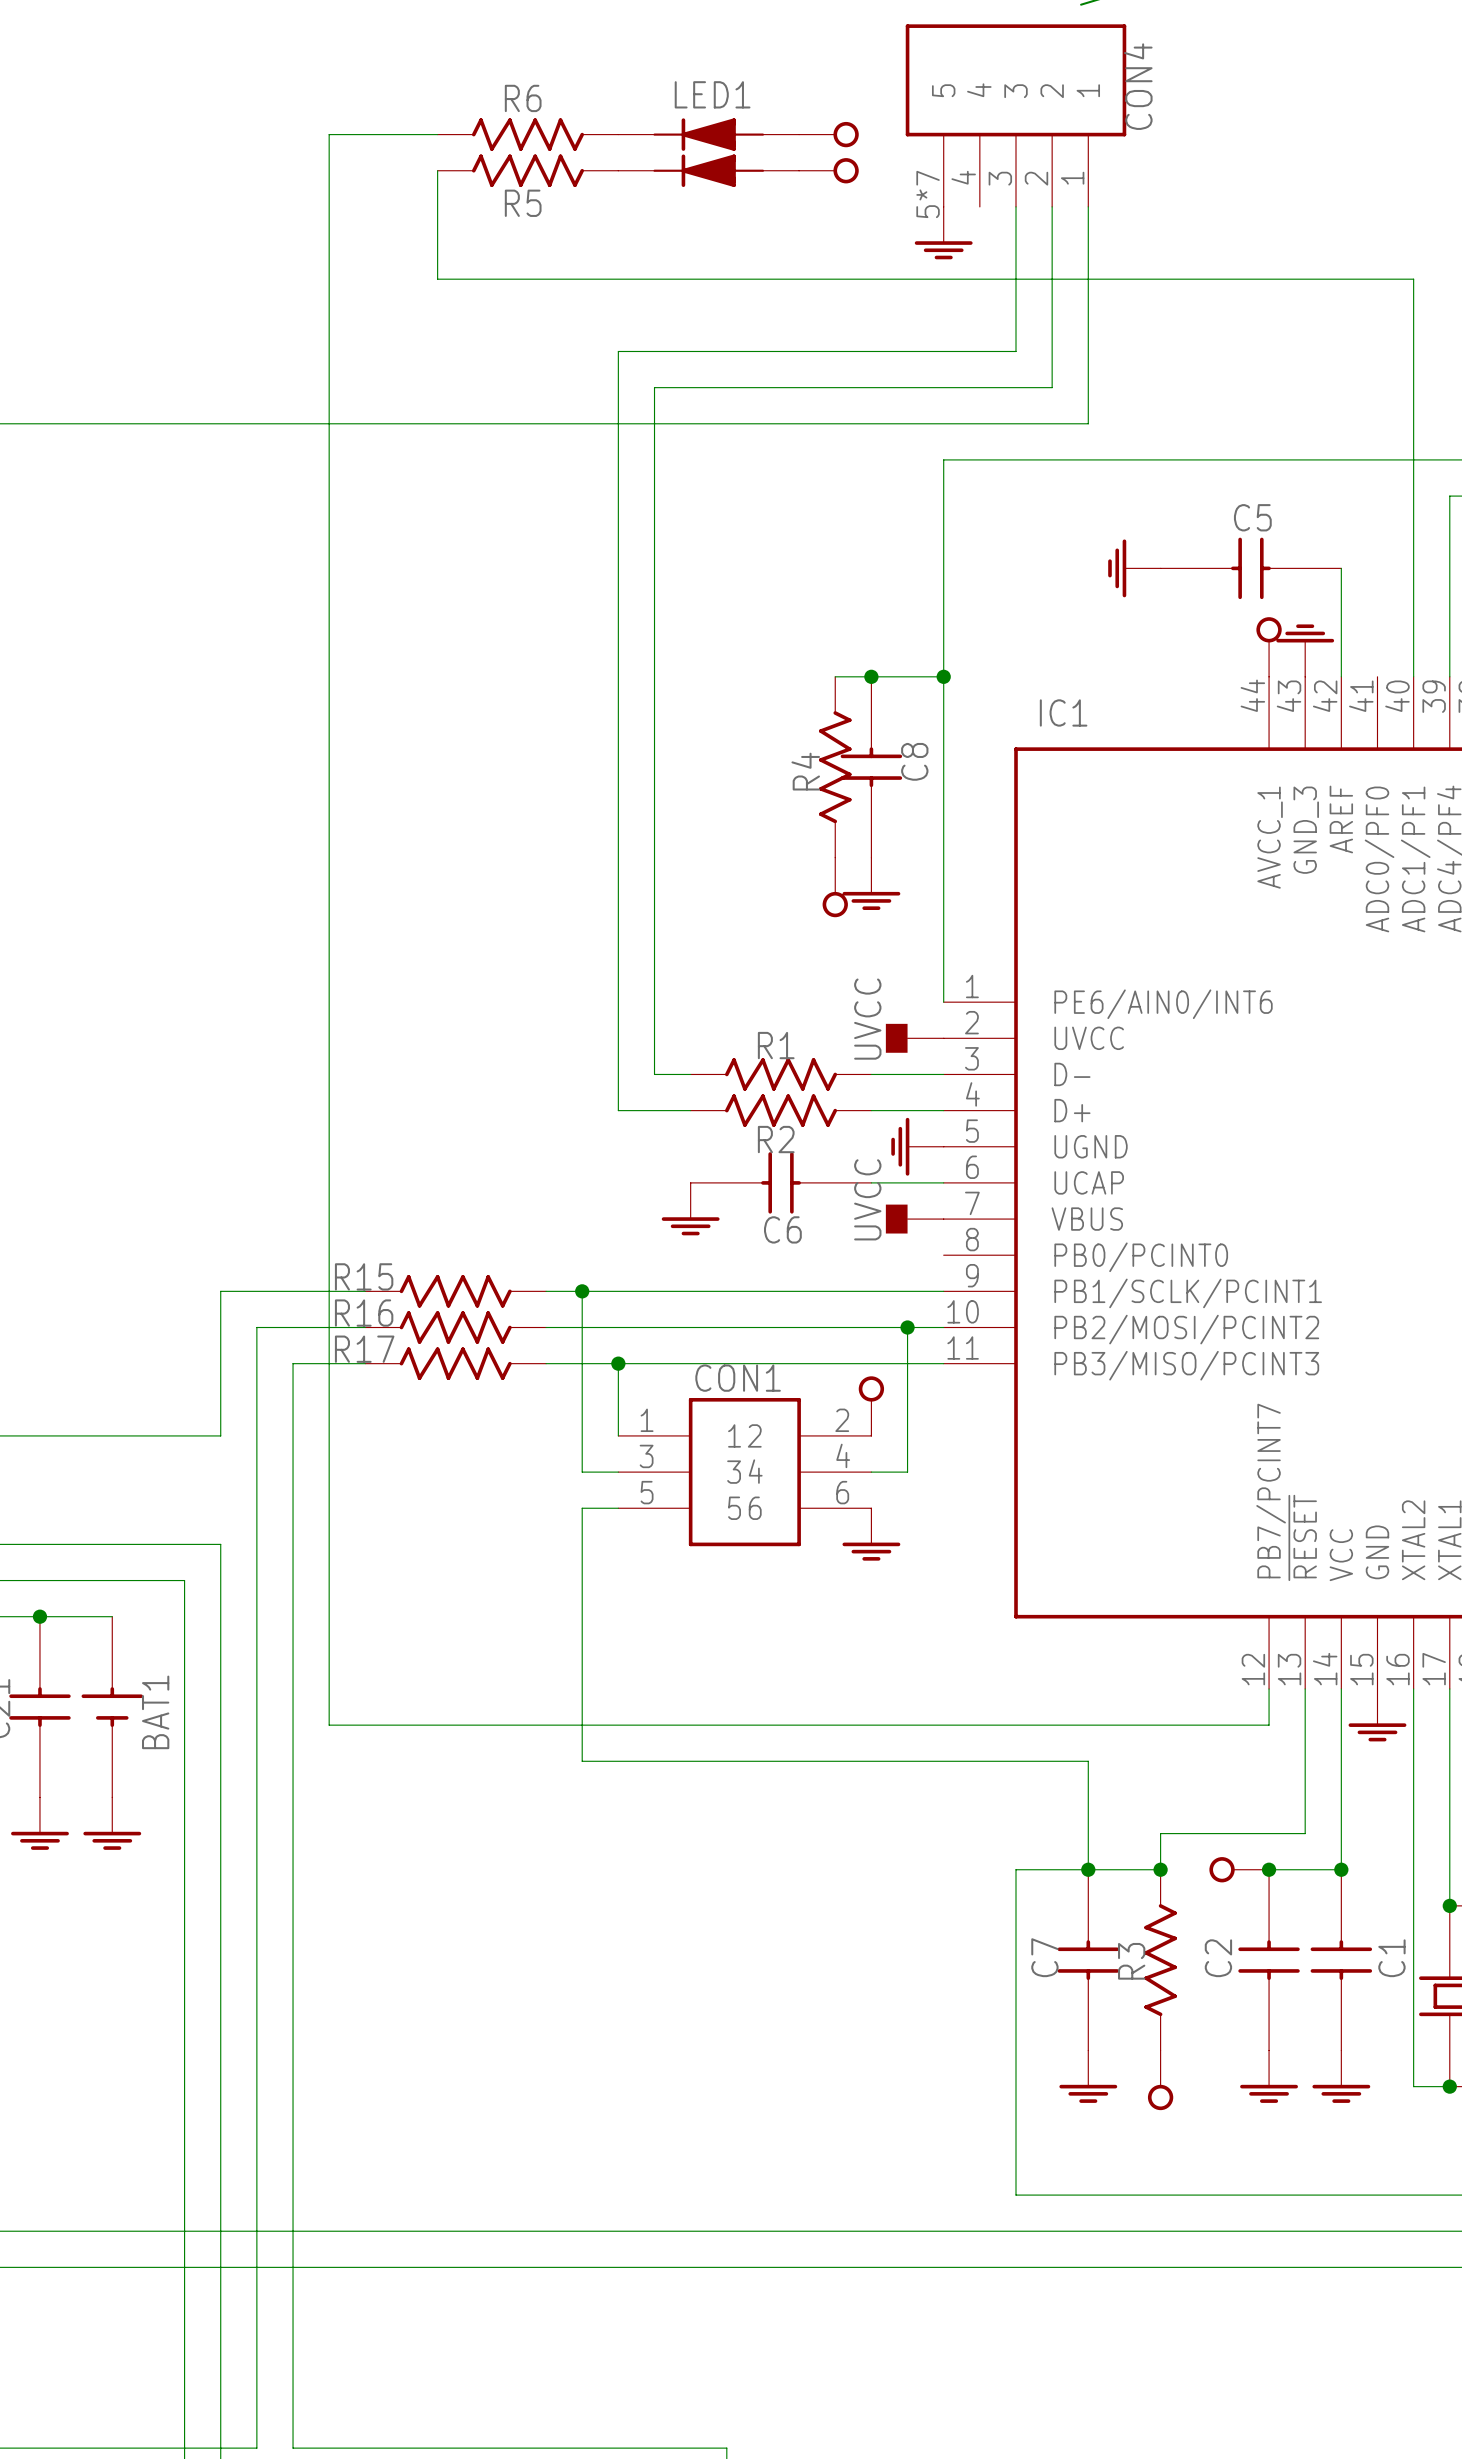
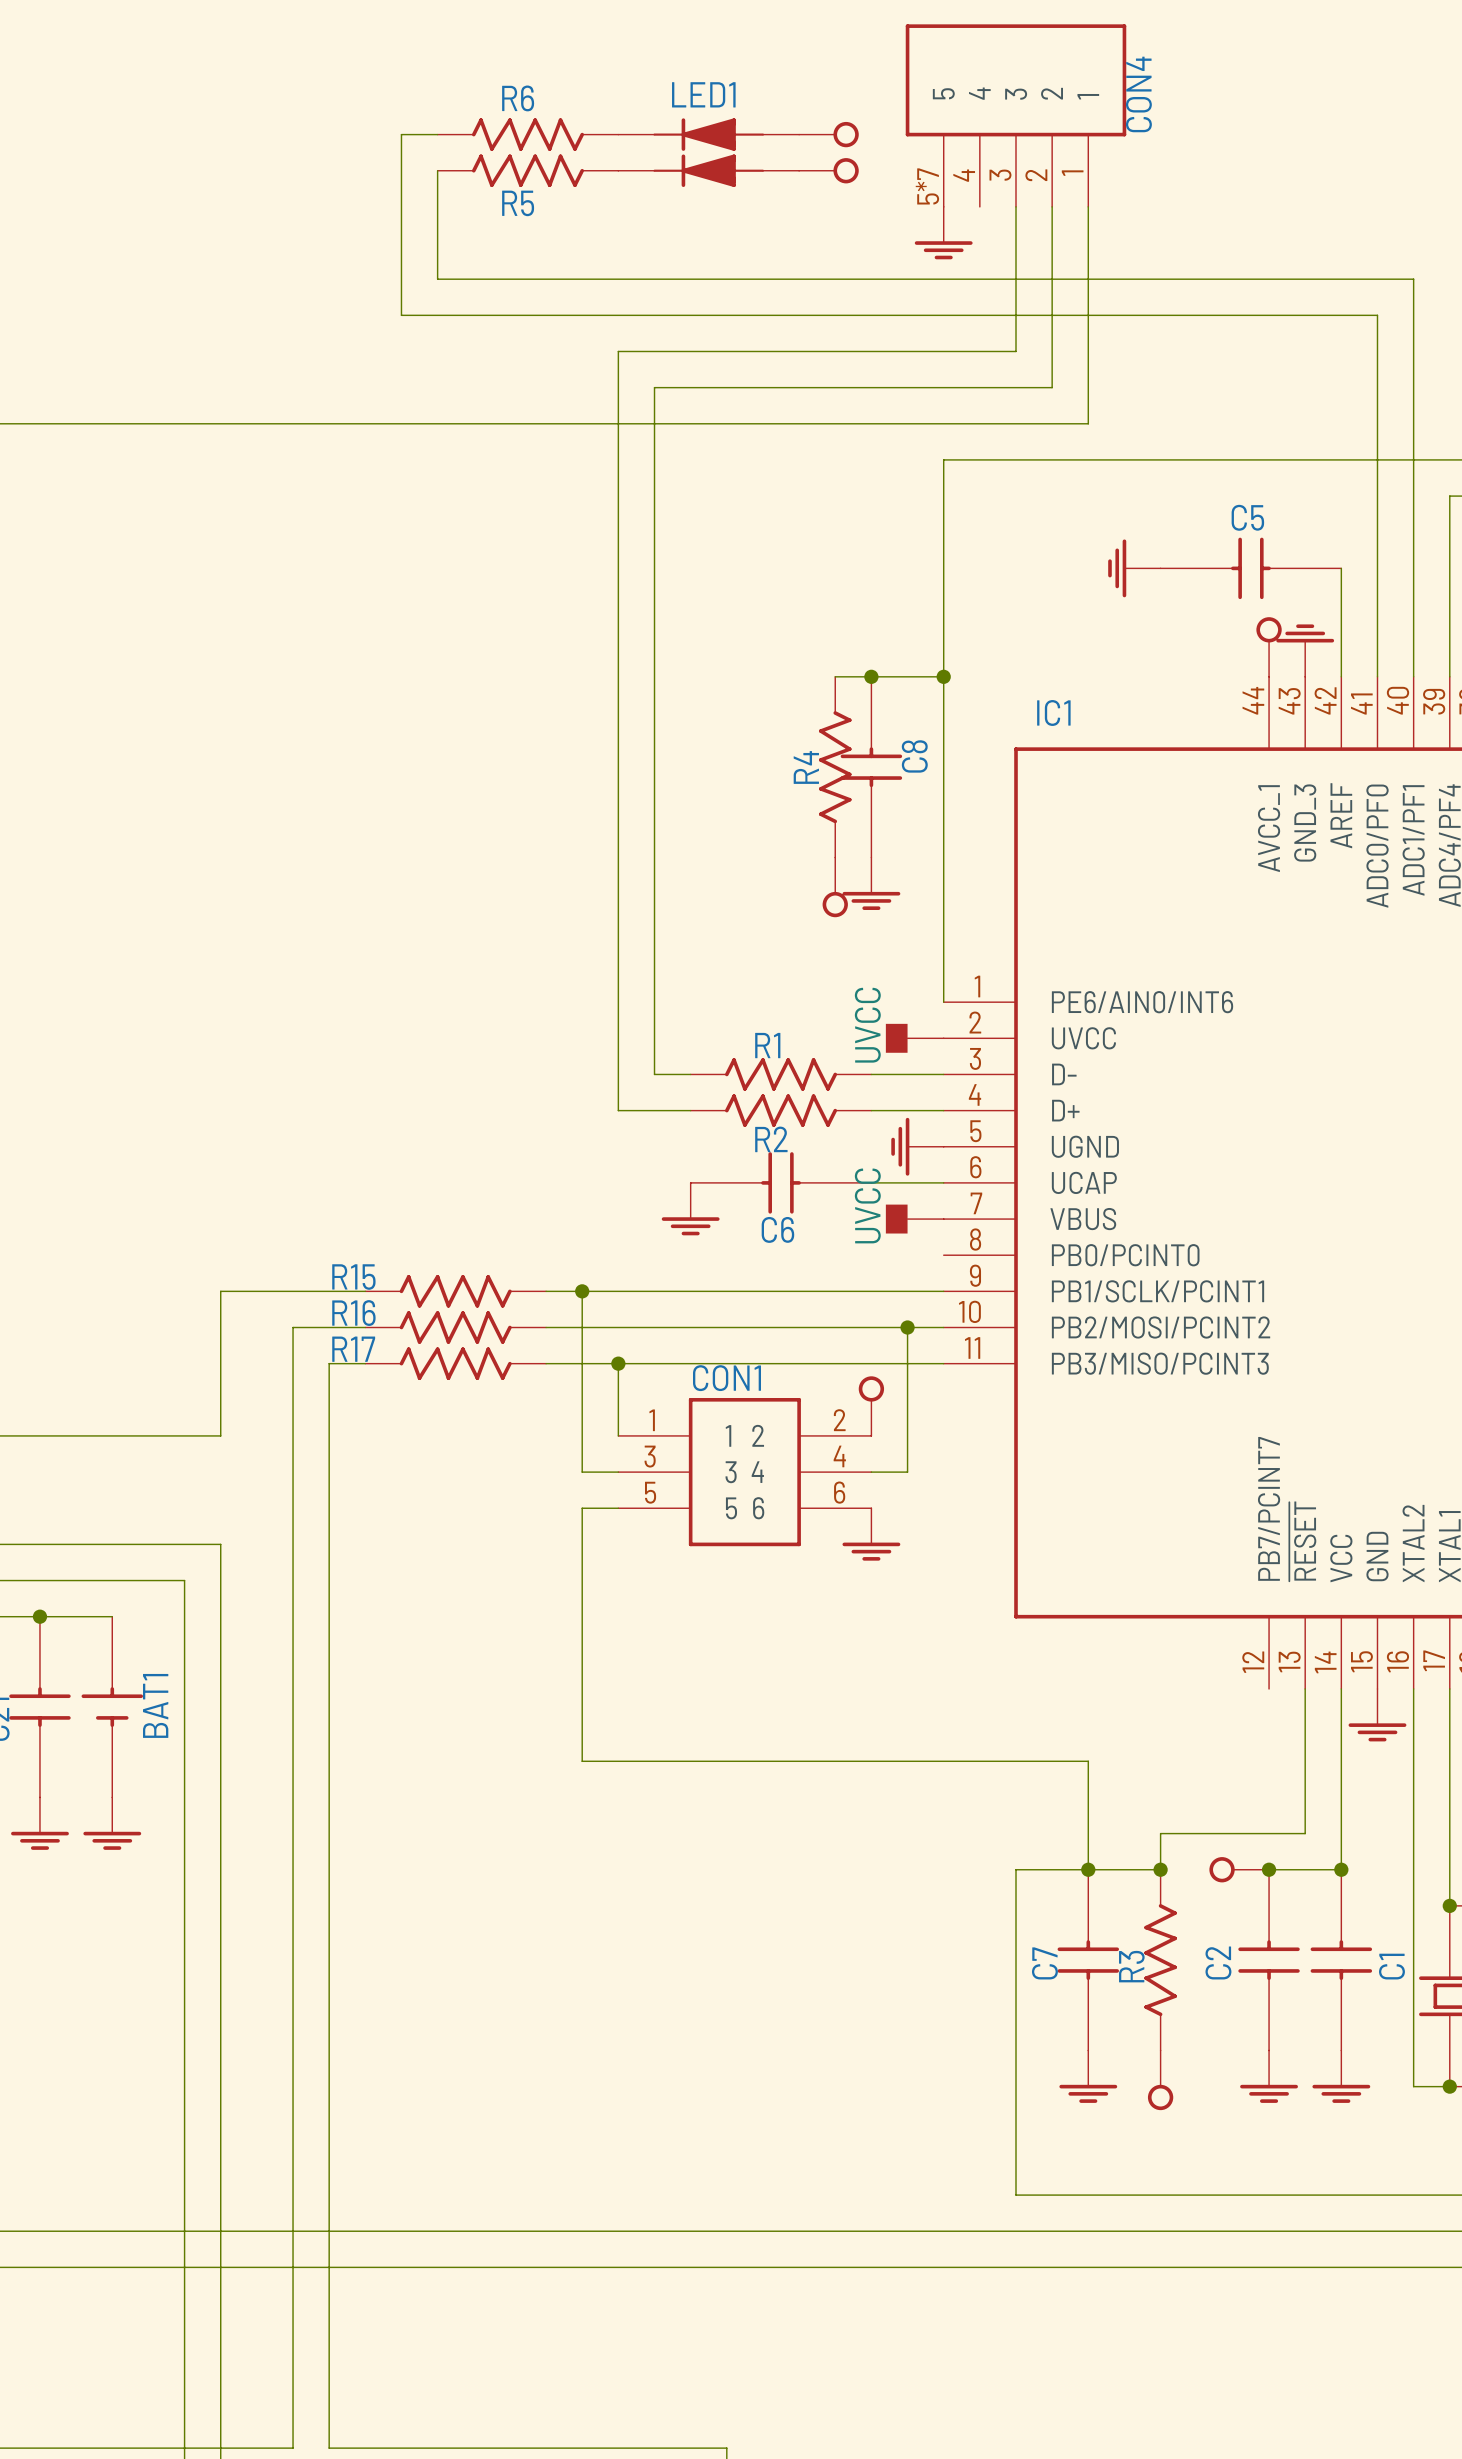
wire: (401, 134) (329, 134) (329, 1363) (293, 1363) -> (401, 134) (401, 315) (1377, 315) (1377, 676)
wire: (293, 1327) (256, 1327) (256, 2448) -> (293, 1327) (293, 1363)
wire: (1269, 1688) (1269, 1725) (329, 1725) -> (329, 2448) (329, 1725)
wire: (293, 2448) (329, 2448) -> (293, 2448) (256, 2448)

